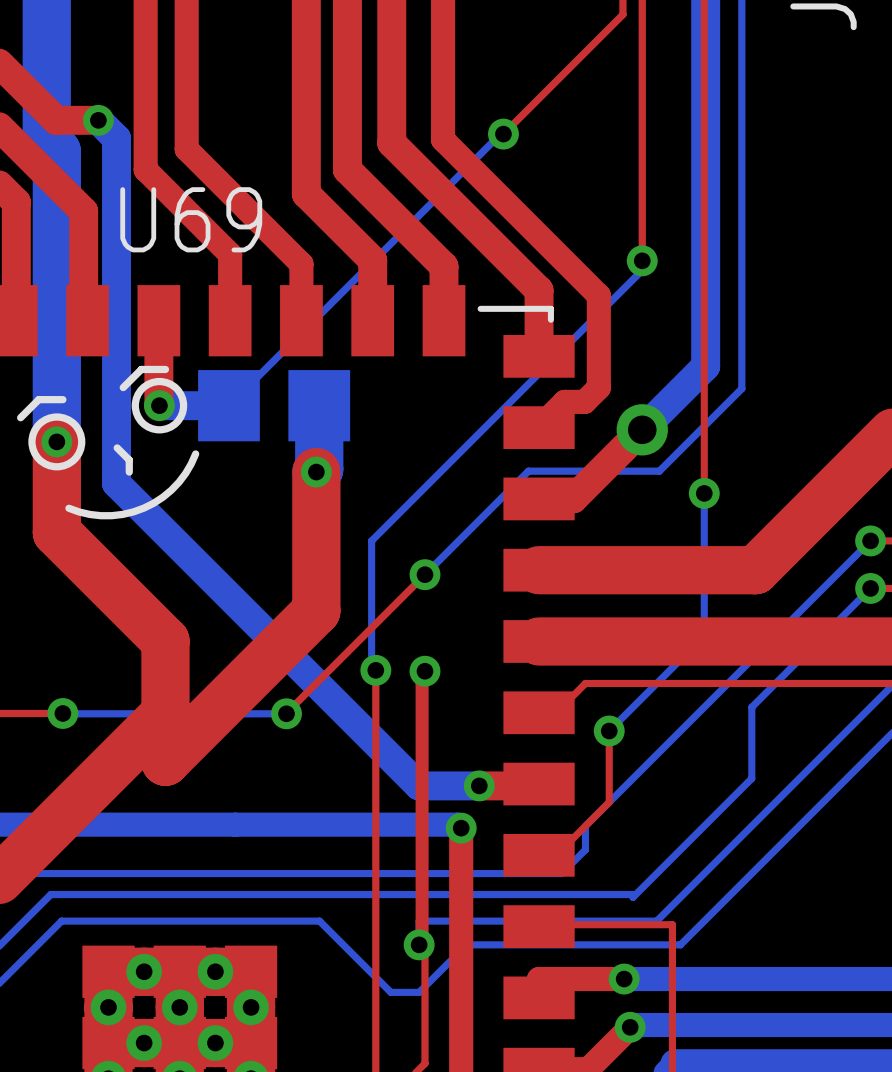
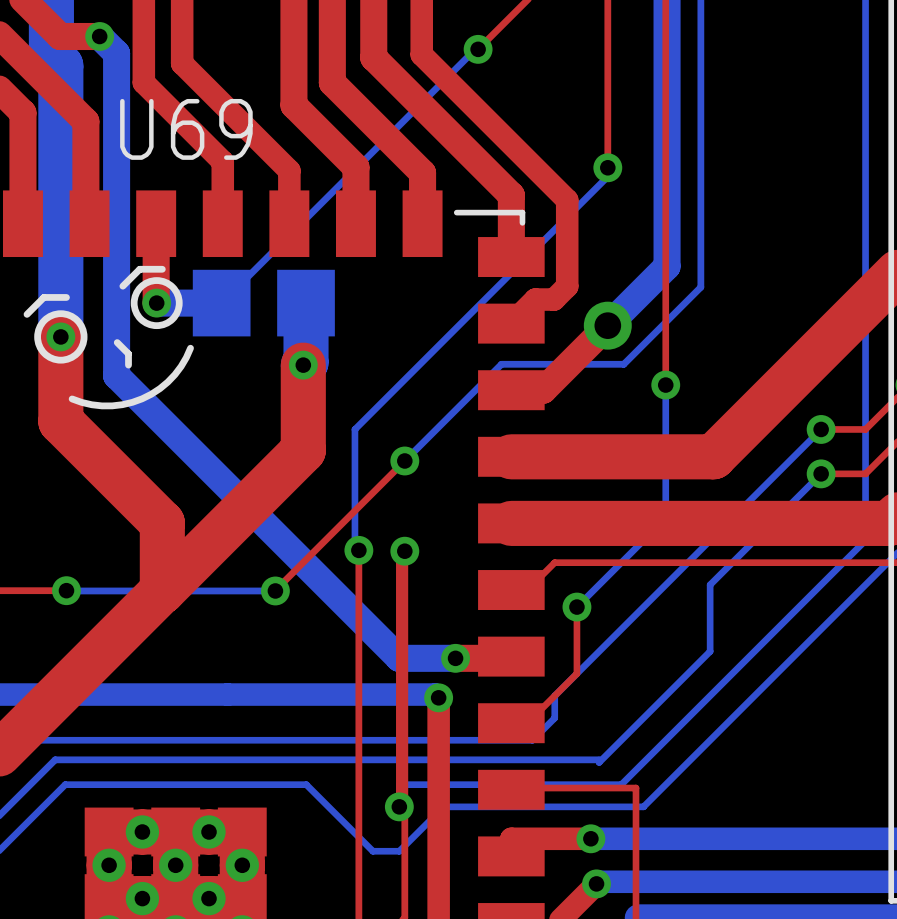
top track: (316, 563) (316, 610) (165, 761) (165, 714) -> (303, 450) (162, 591)

